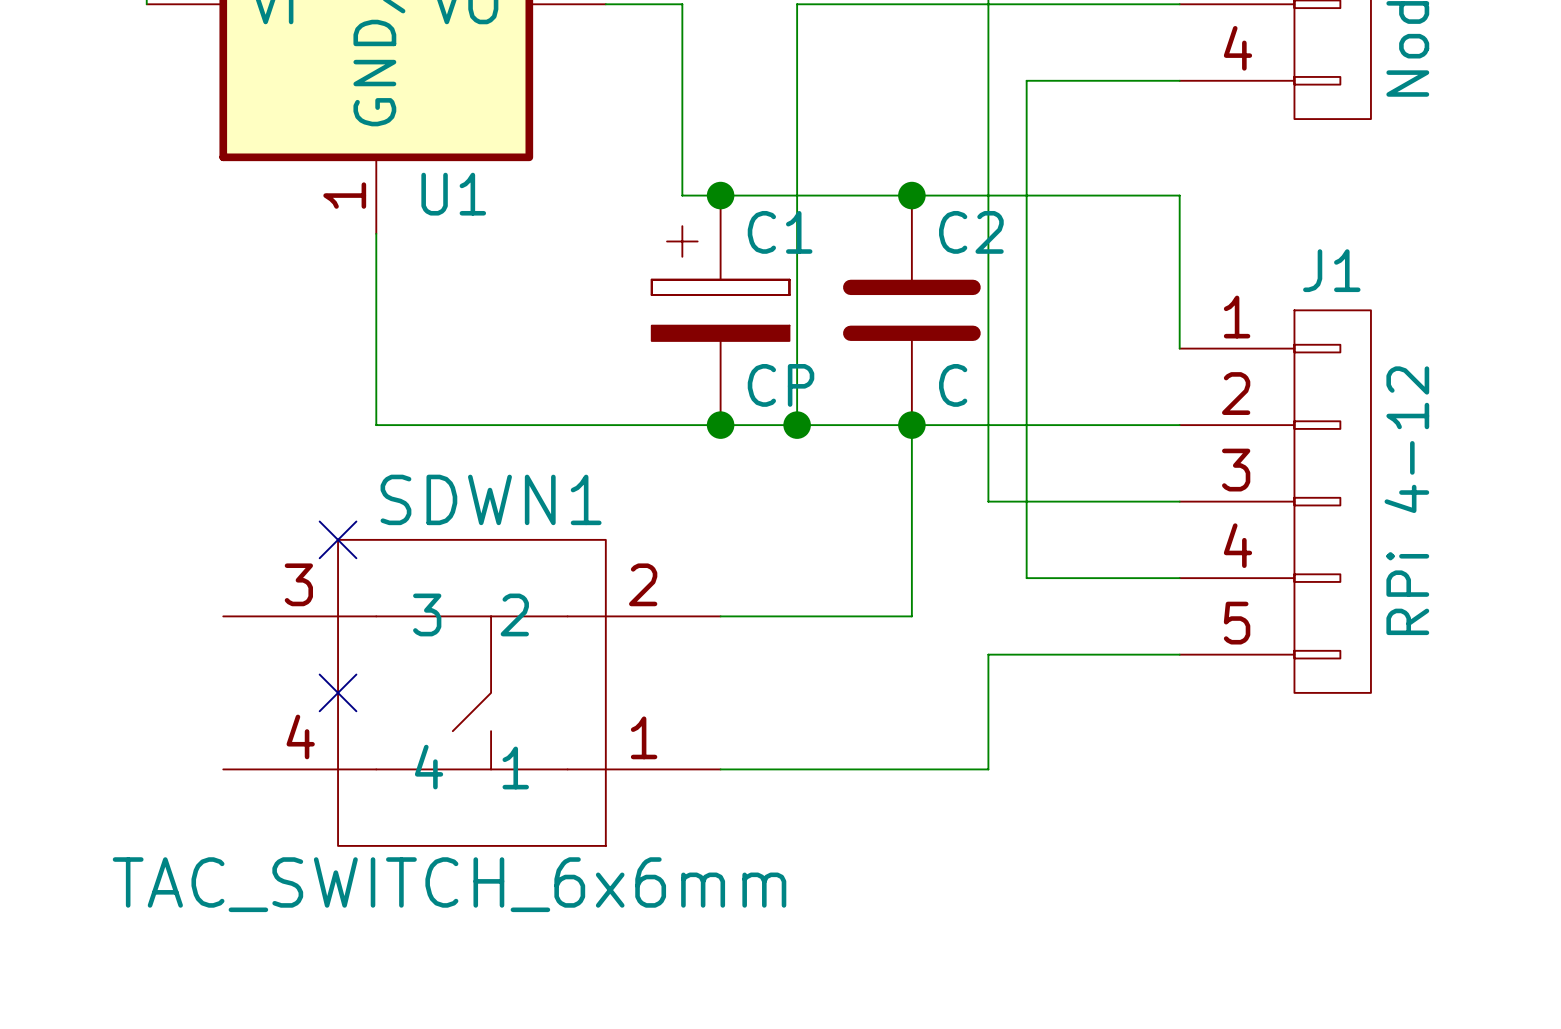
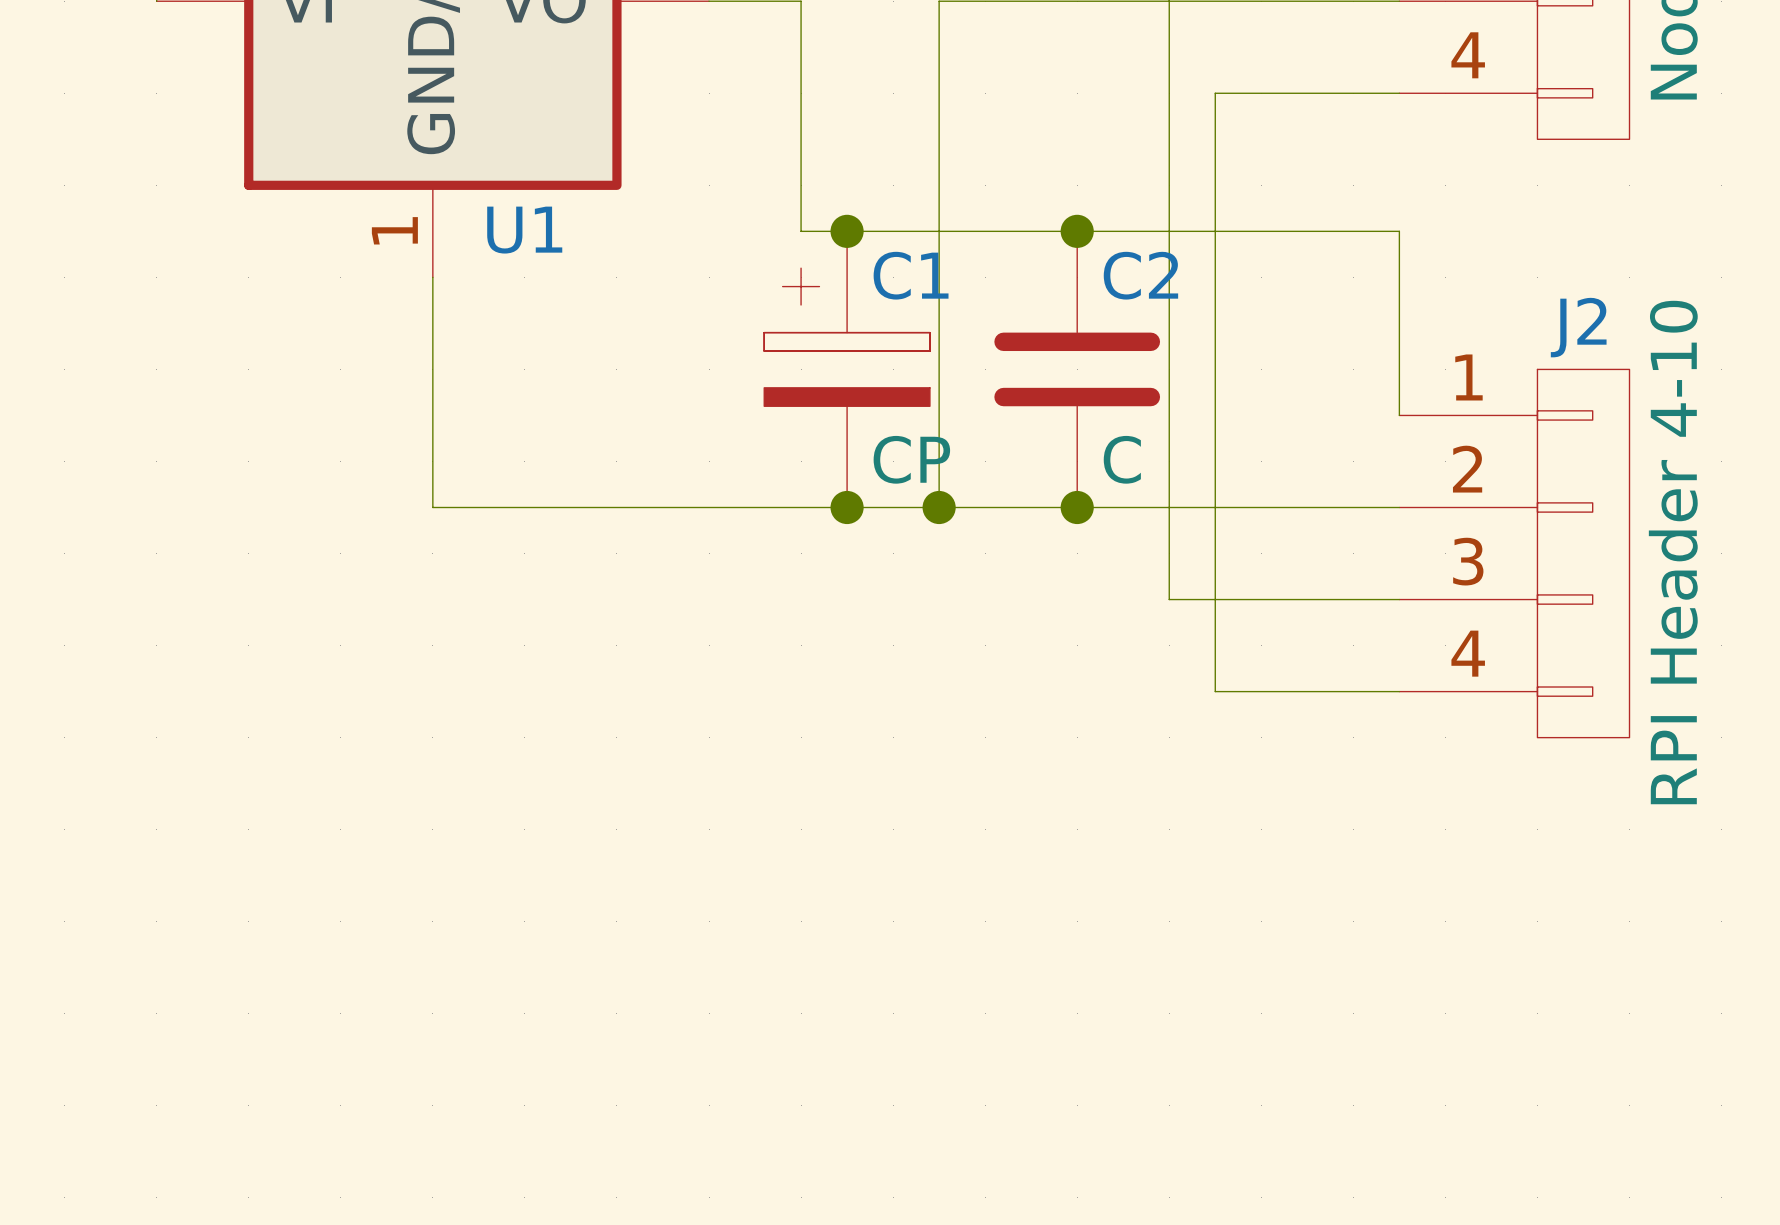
wire: (911, 425) (911, 616) (720, 616) -> none
J2: none -> RPI Header 4-10 (1514, 553)
J1: RPi 4-12 (1275, 501) -> none
no-connect mark: (338, 539) -> none
wire: (1179, 654) (988, 654) (988, 769) (720, 769) -> none
no-connect mark: (338, 692) -> none
SDWN1: TAC_SWITCH_6x6mm (471, 692) -> none

